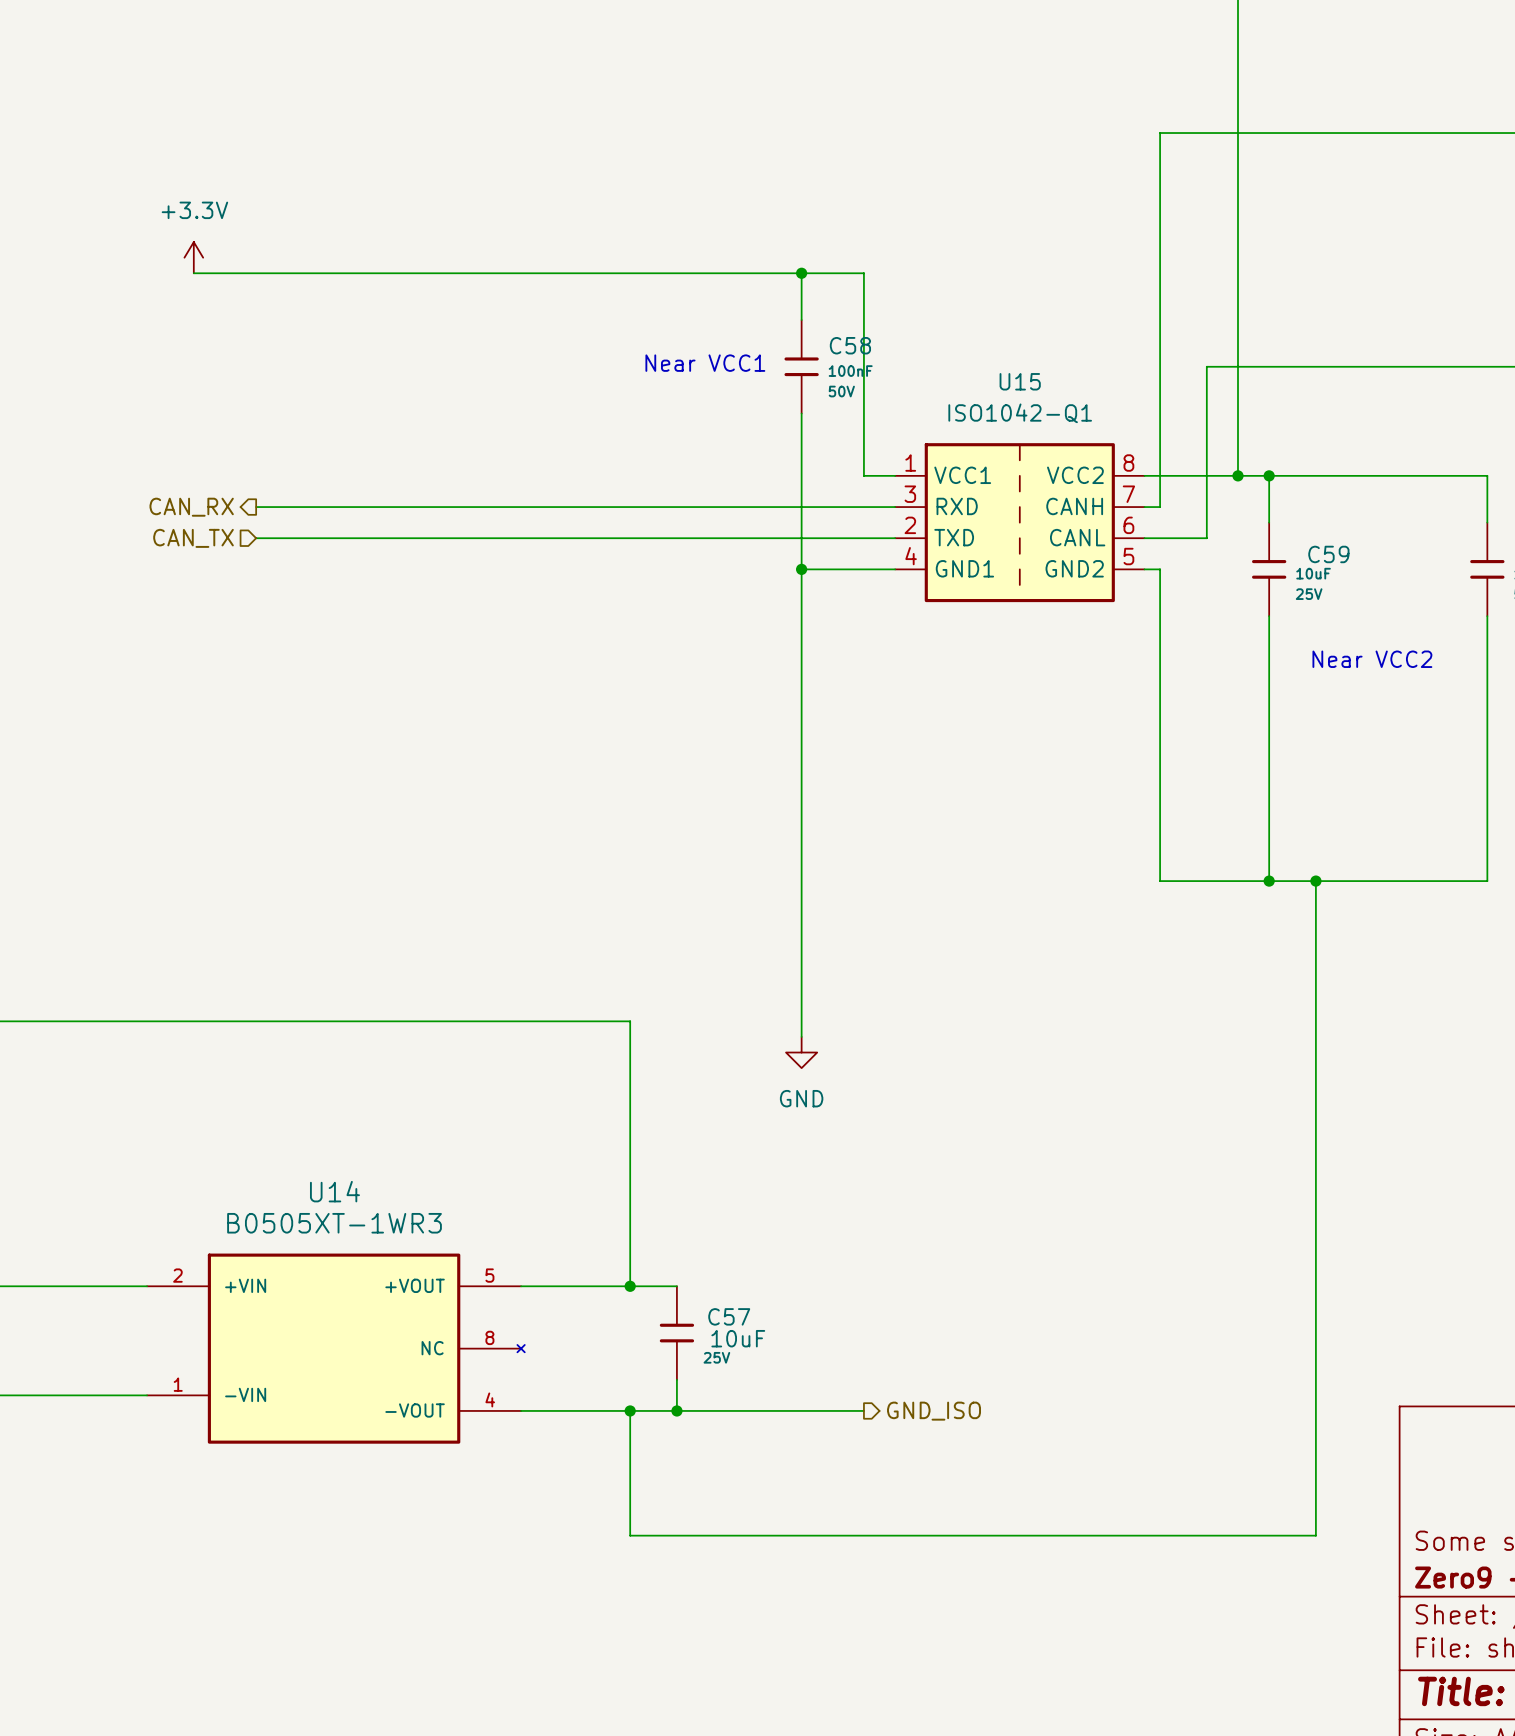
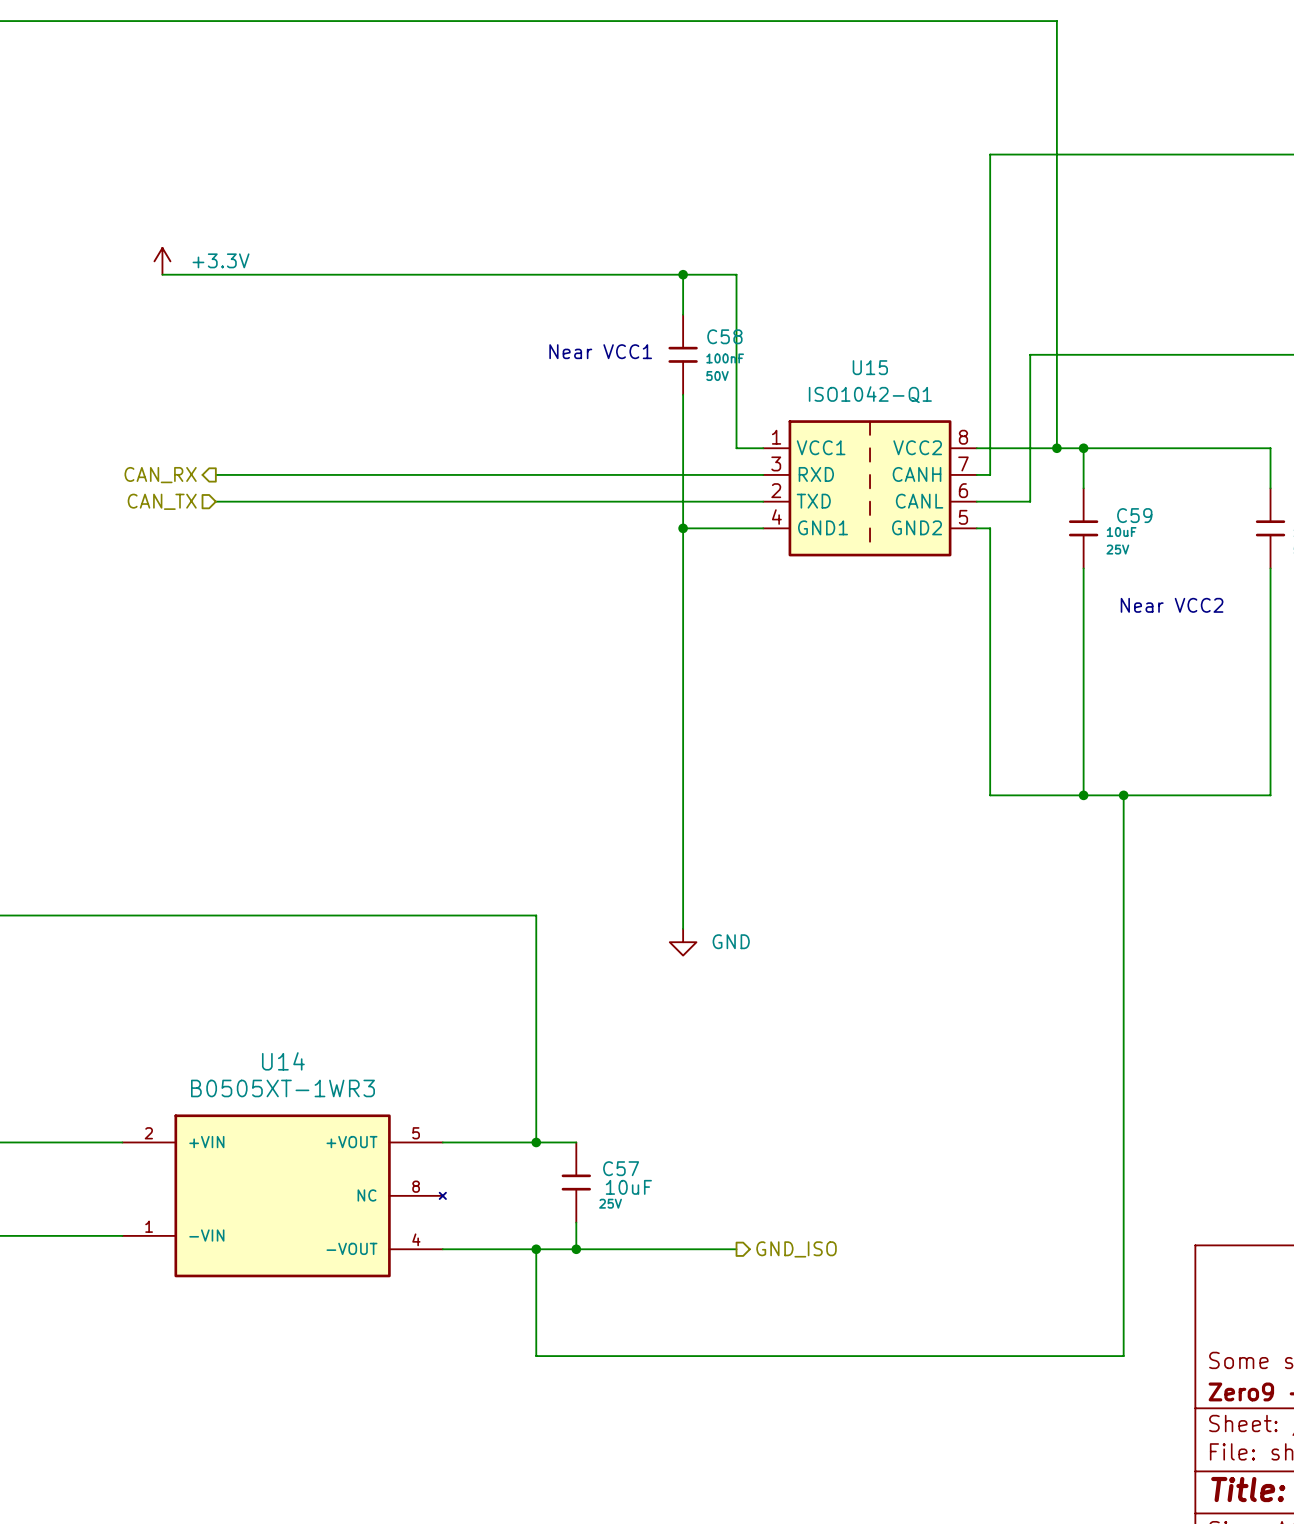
power symbol text position: +3.3V (194, 210) -> +3.3V (221, 260)
power symbol text position: GND (801, 1098) -> GND (731, 941)

